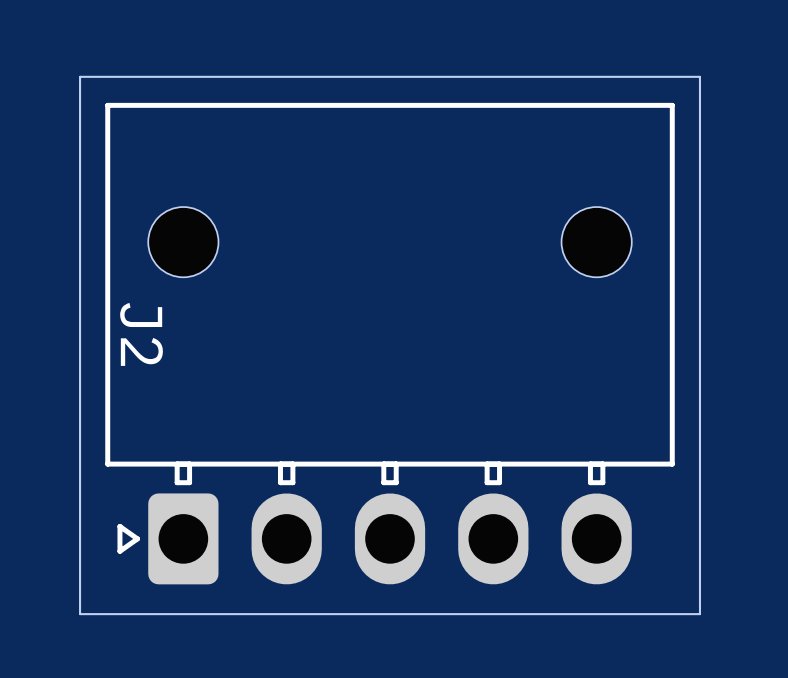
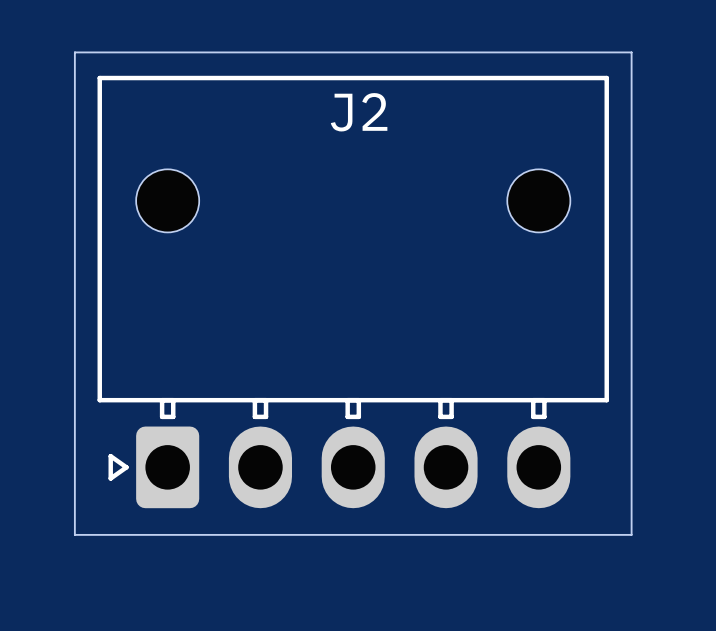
J2 name rotation: 0° (141, 334) -> 90° counterclockwise (359, 112)
J2 name position: J2 (141, 334) -> J2 (359, 112)

